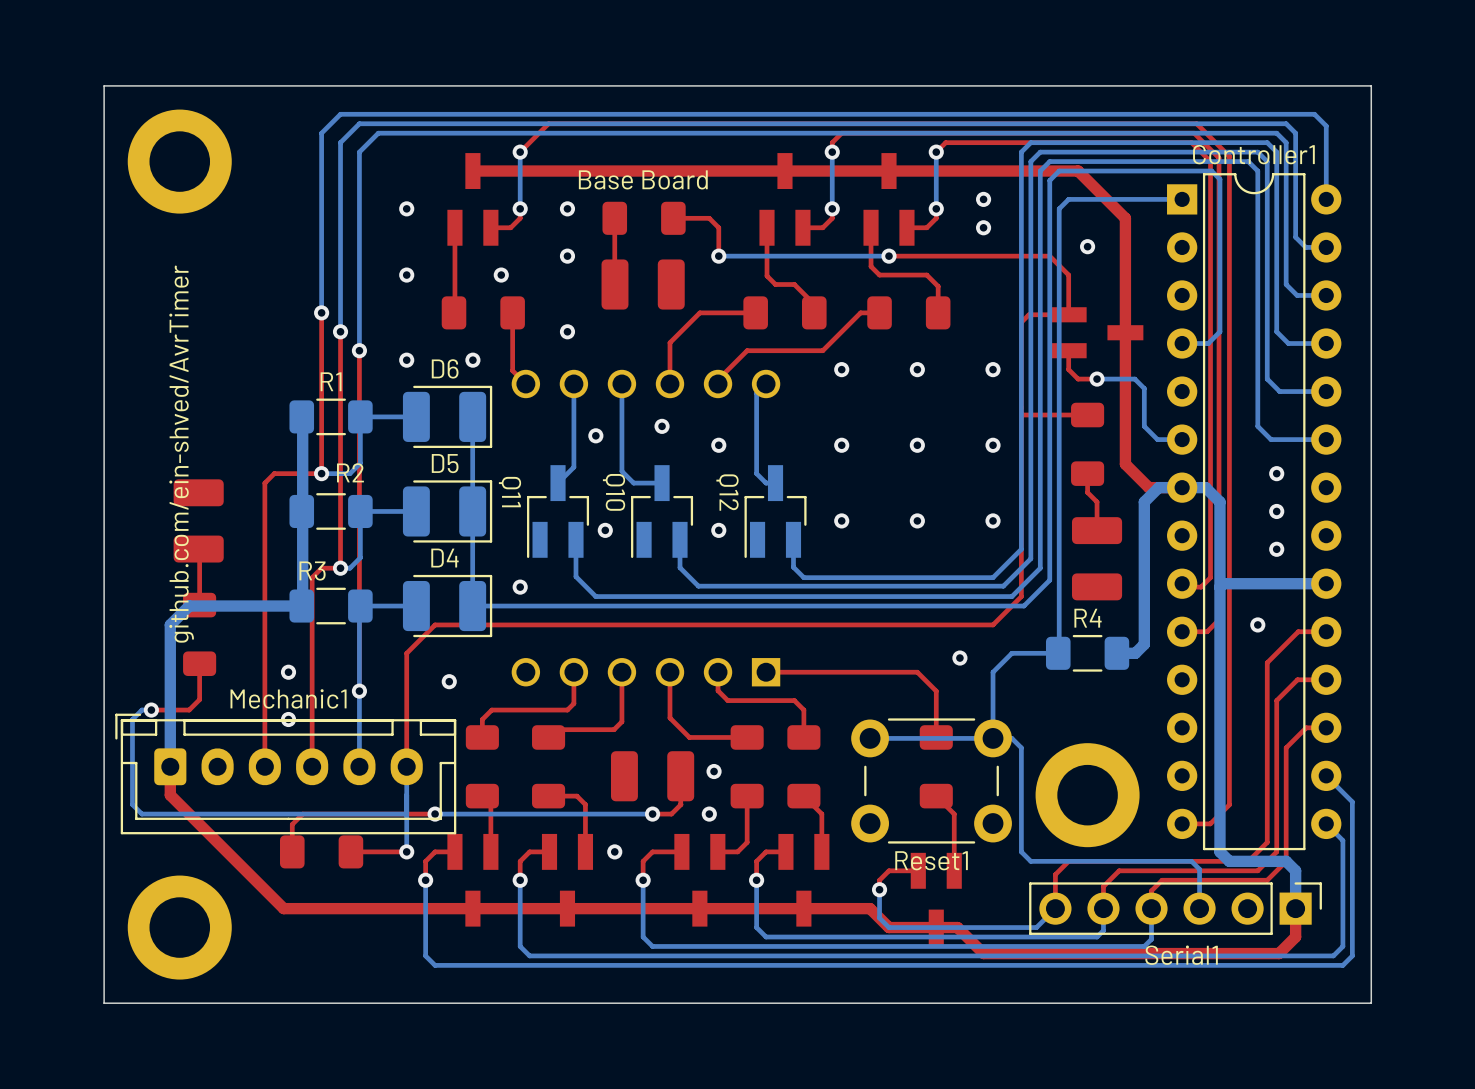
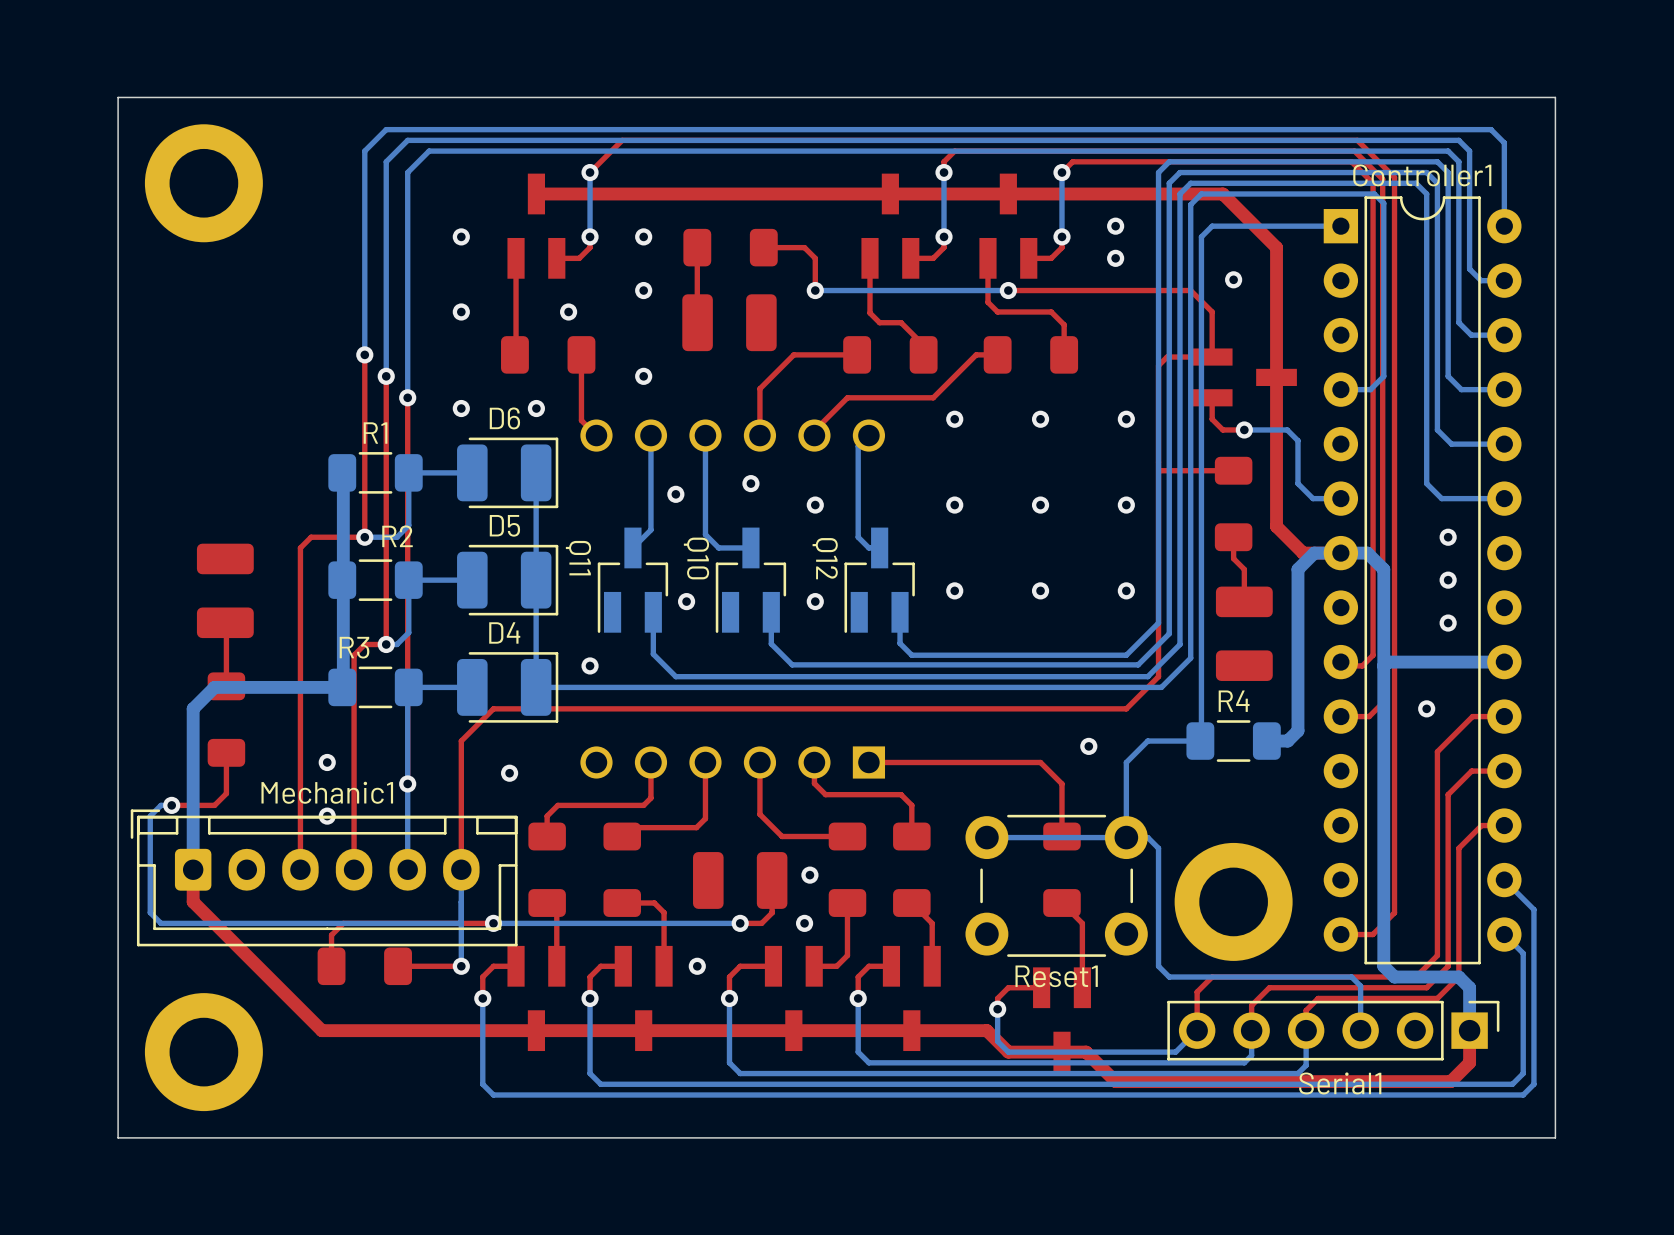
text: Base Board (643, 179) -> none
text: github.com/ein-shved/AvrTimer (181, 454) -> none

